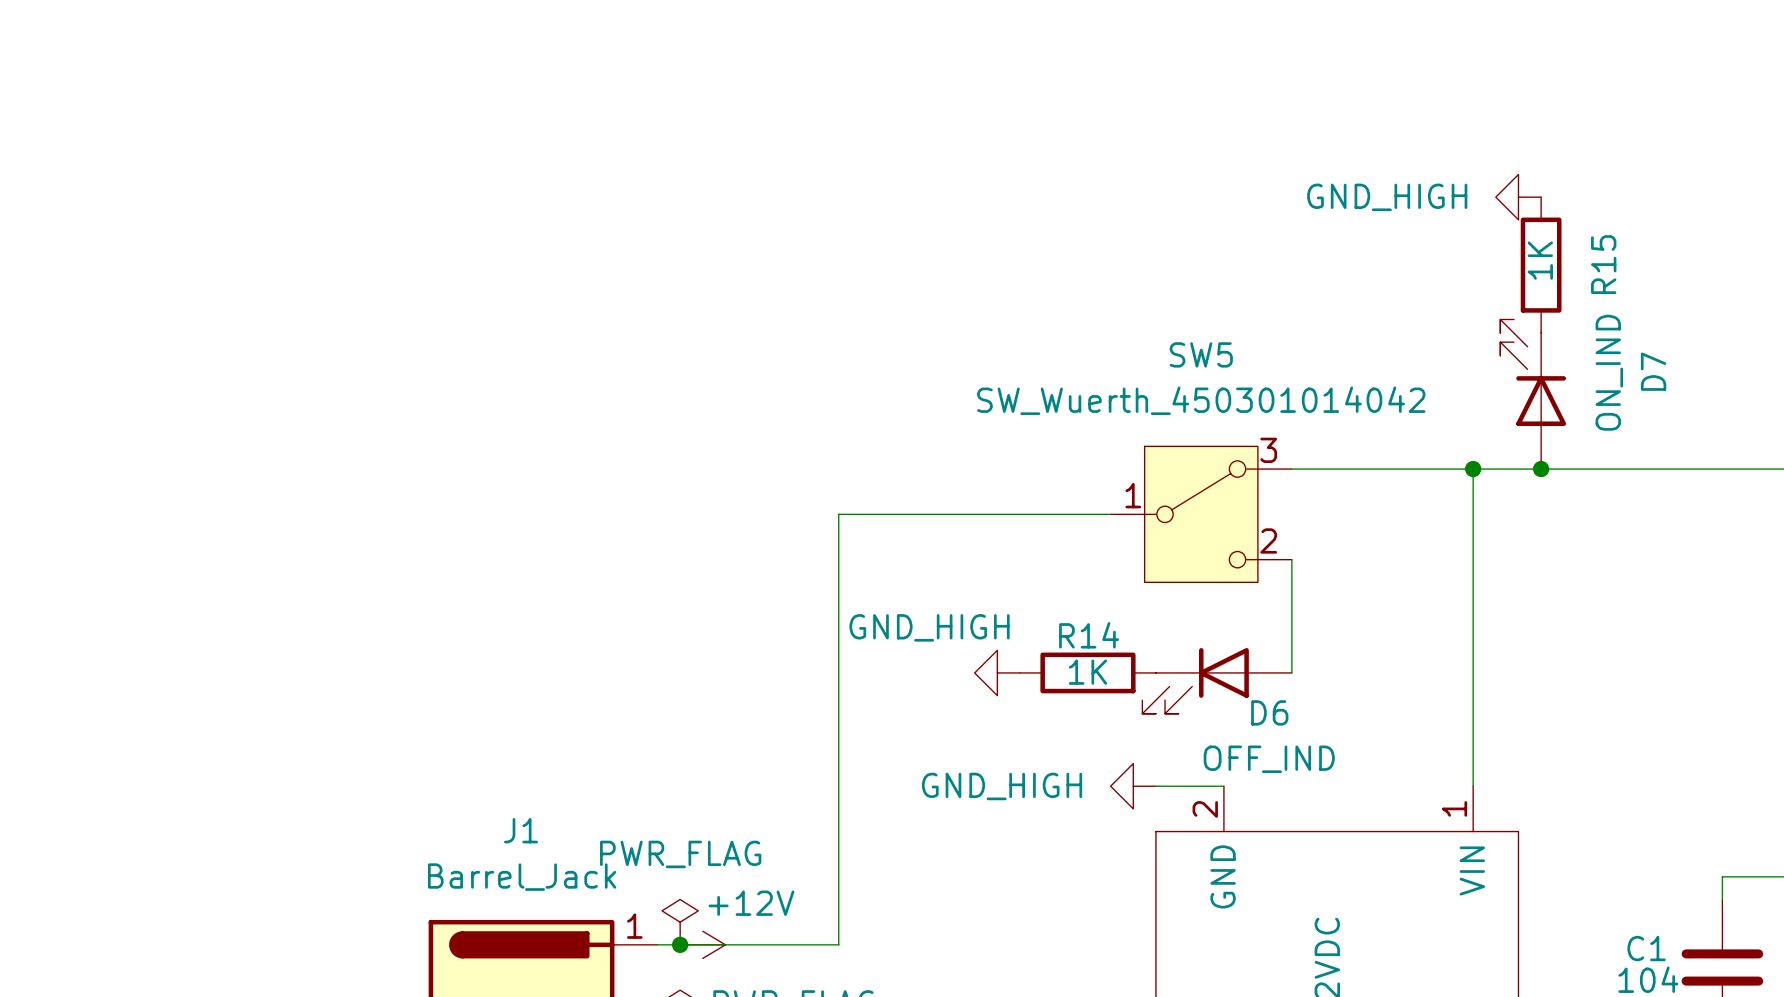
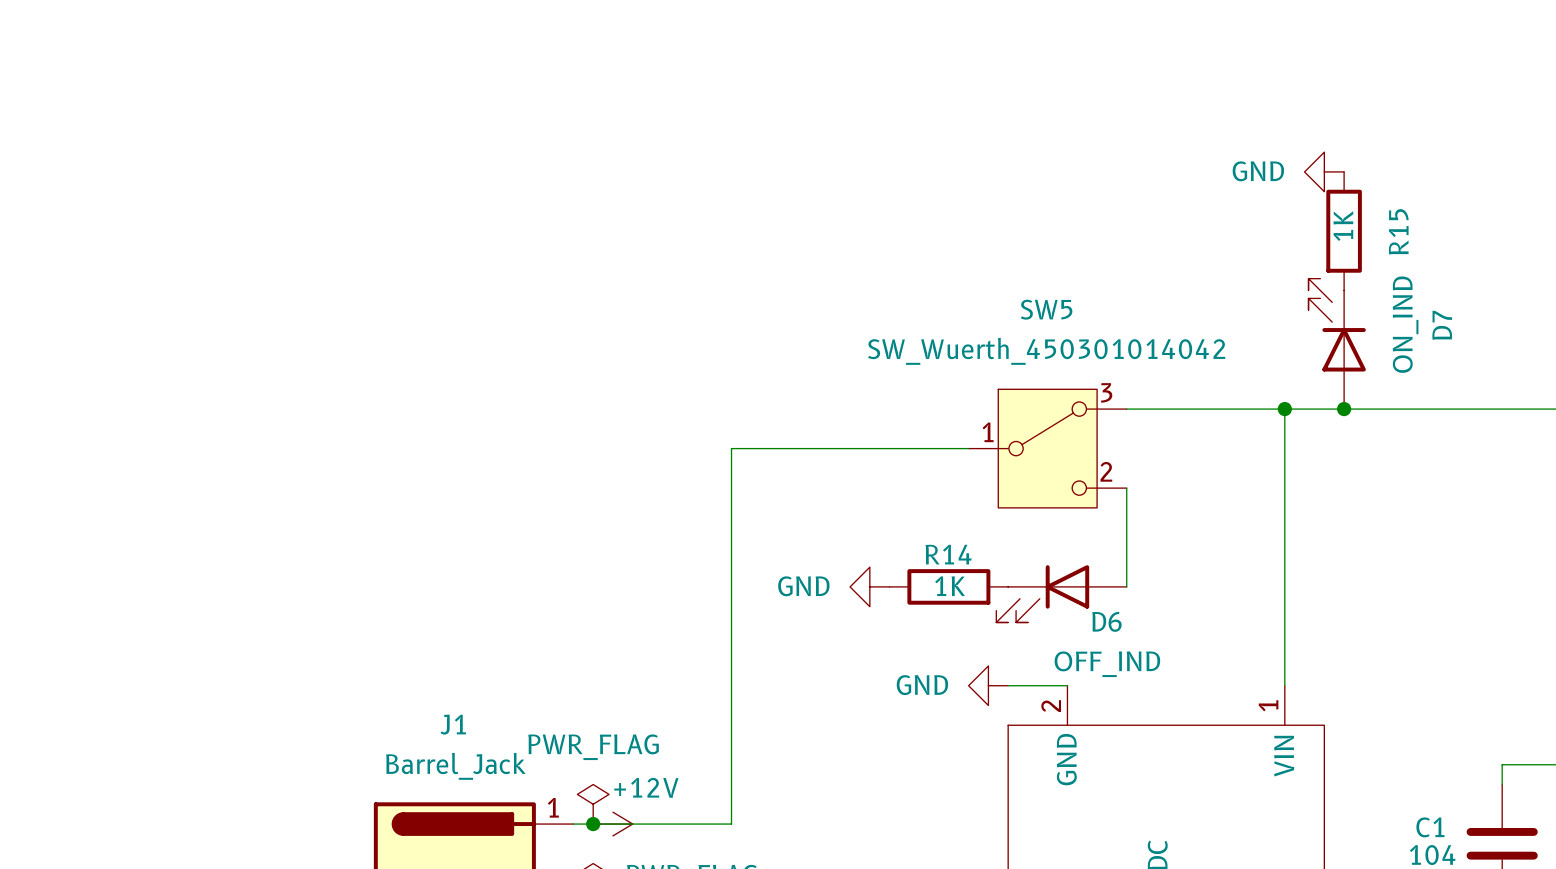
power symbol: GND_HIGH (1518, 197) -> GND (1324, 171)
power symbol: GND_HIGH (997, 672) -> GND (869, 586)
power symbol: GND_HIGH (1133, 786) -> GND (988, 685)

